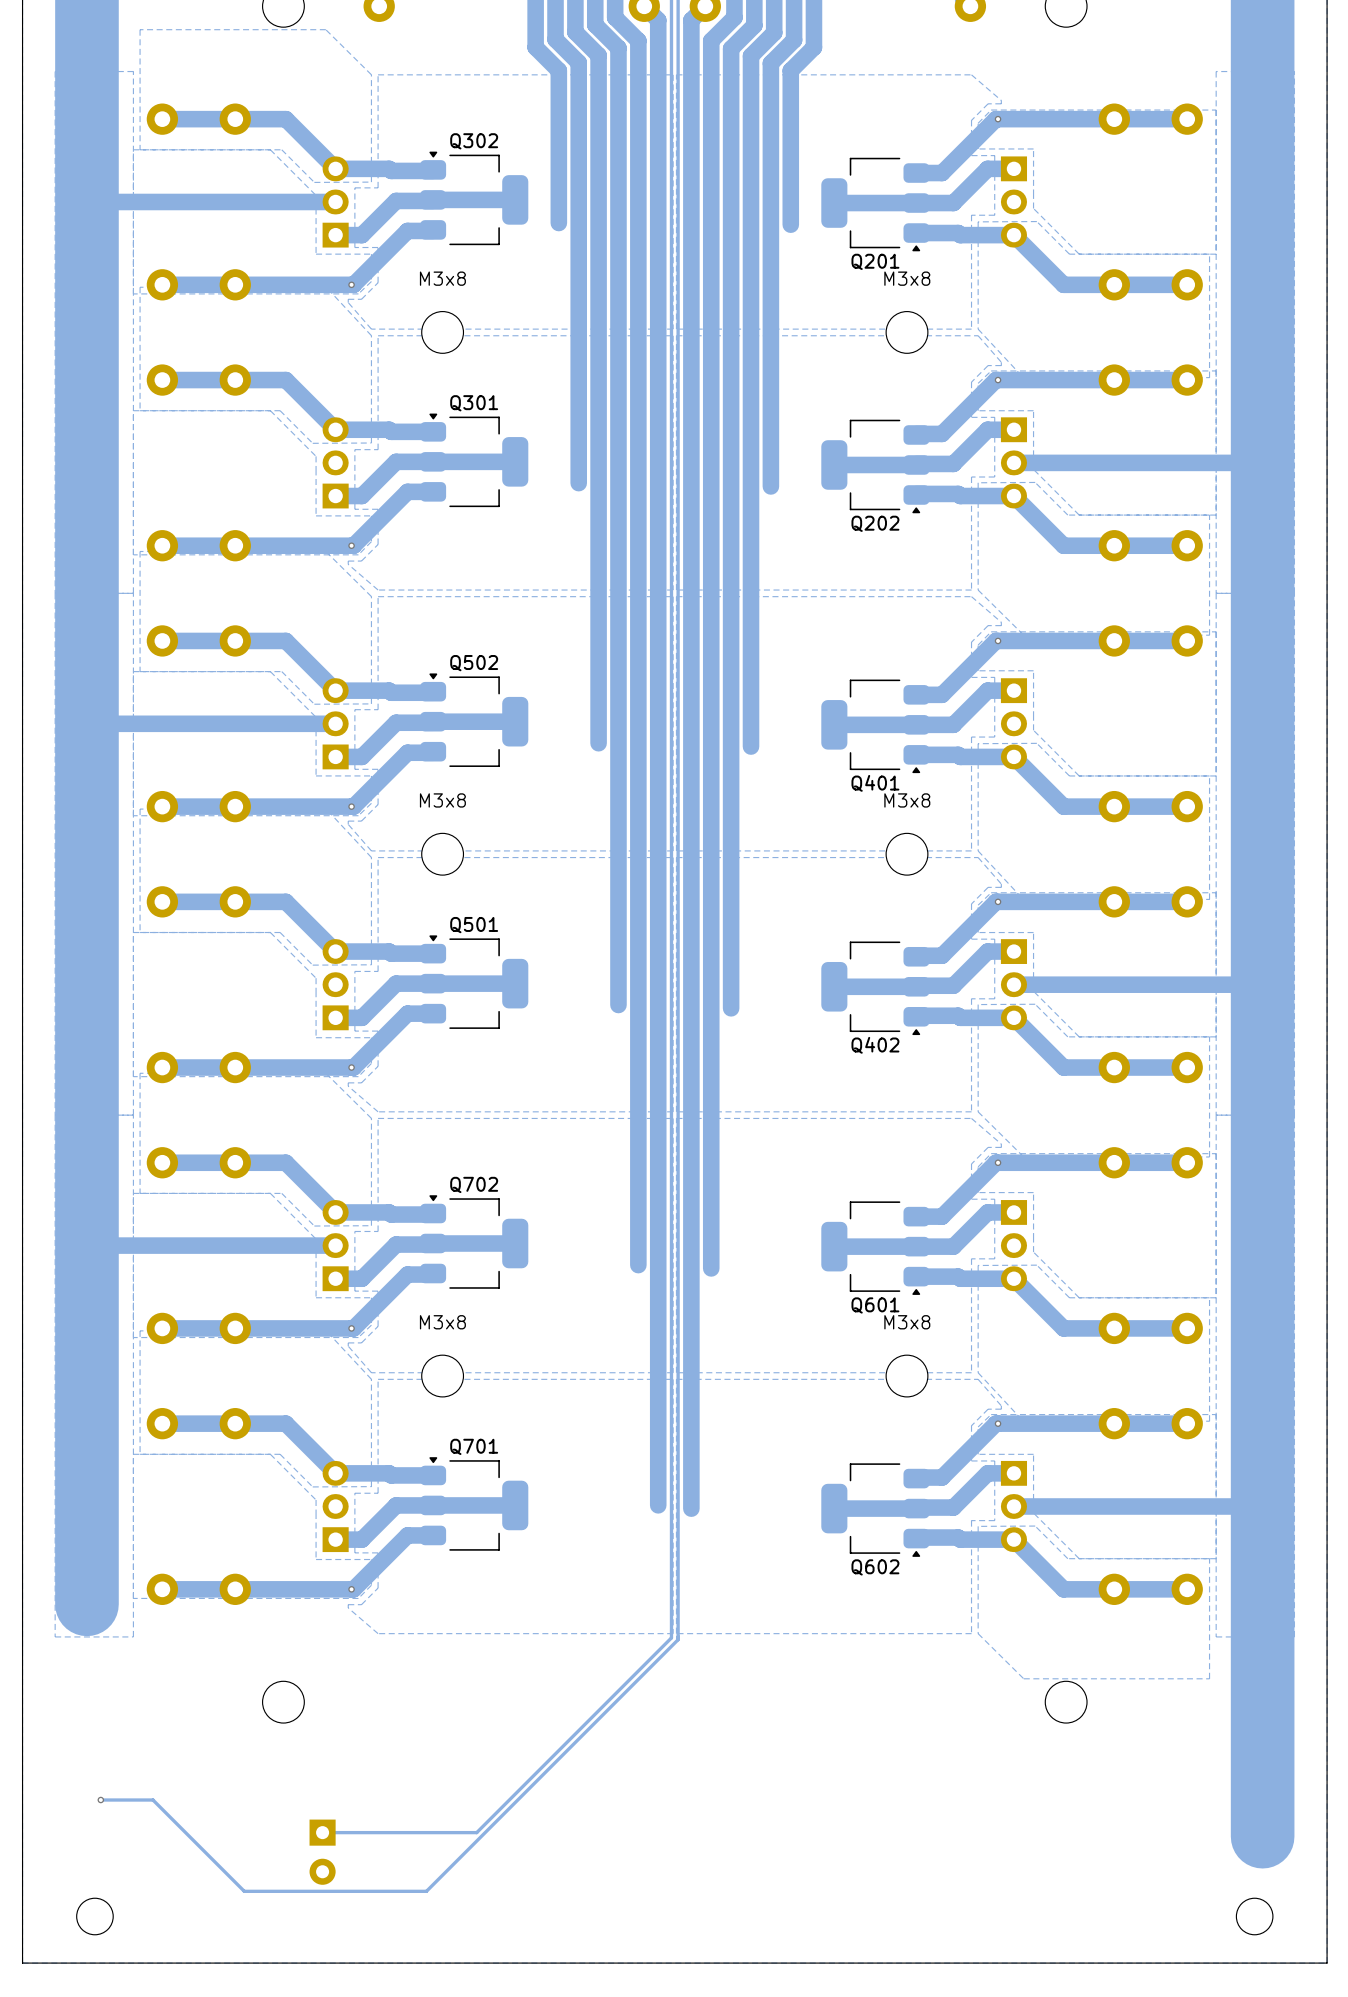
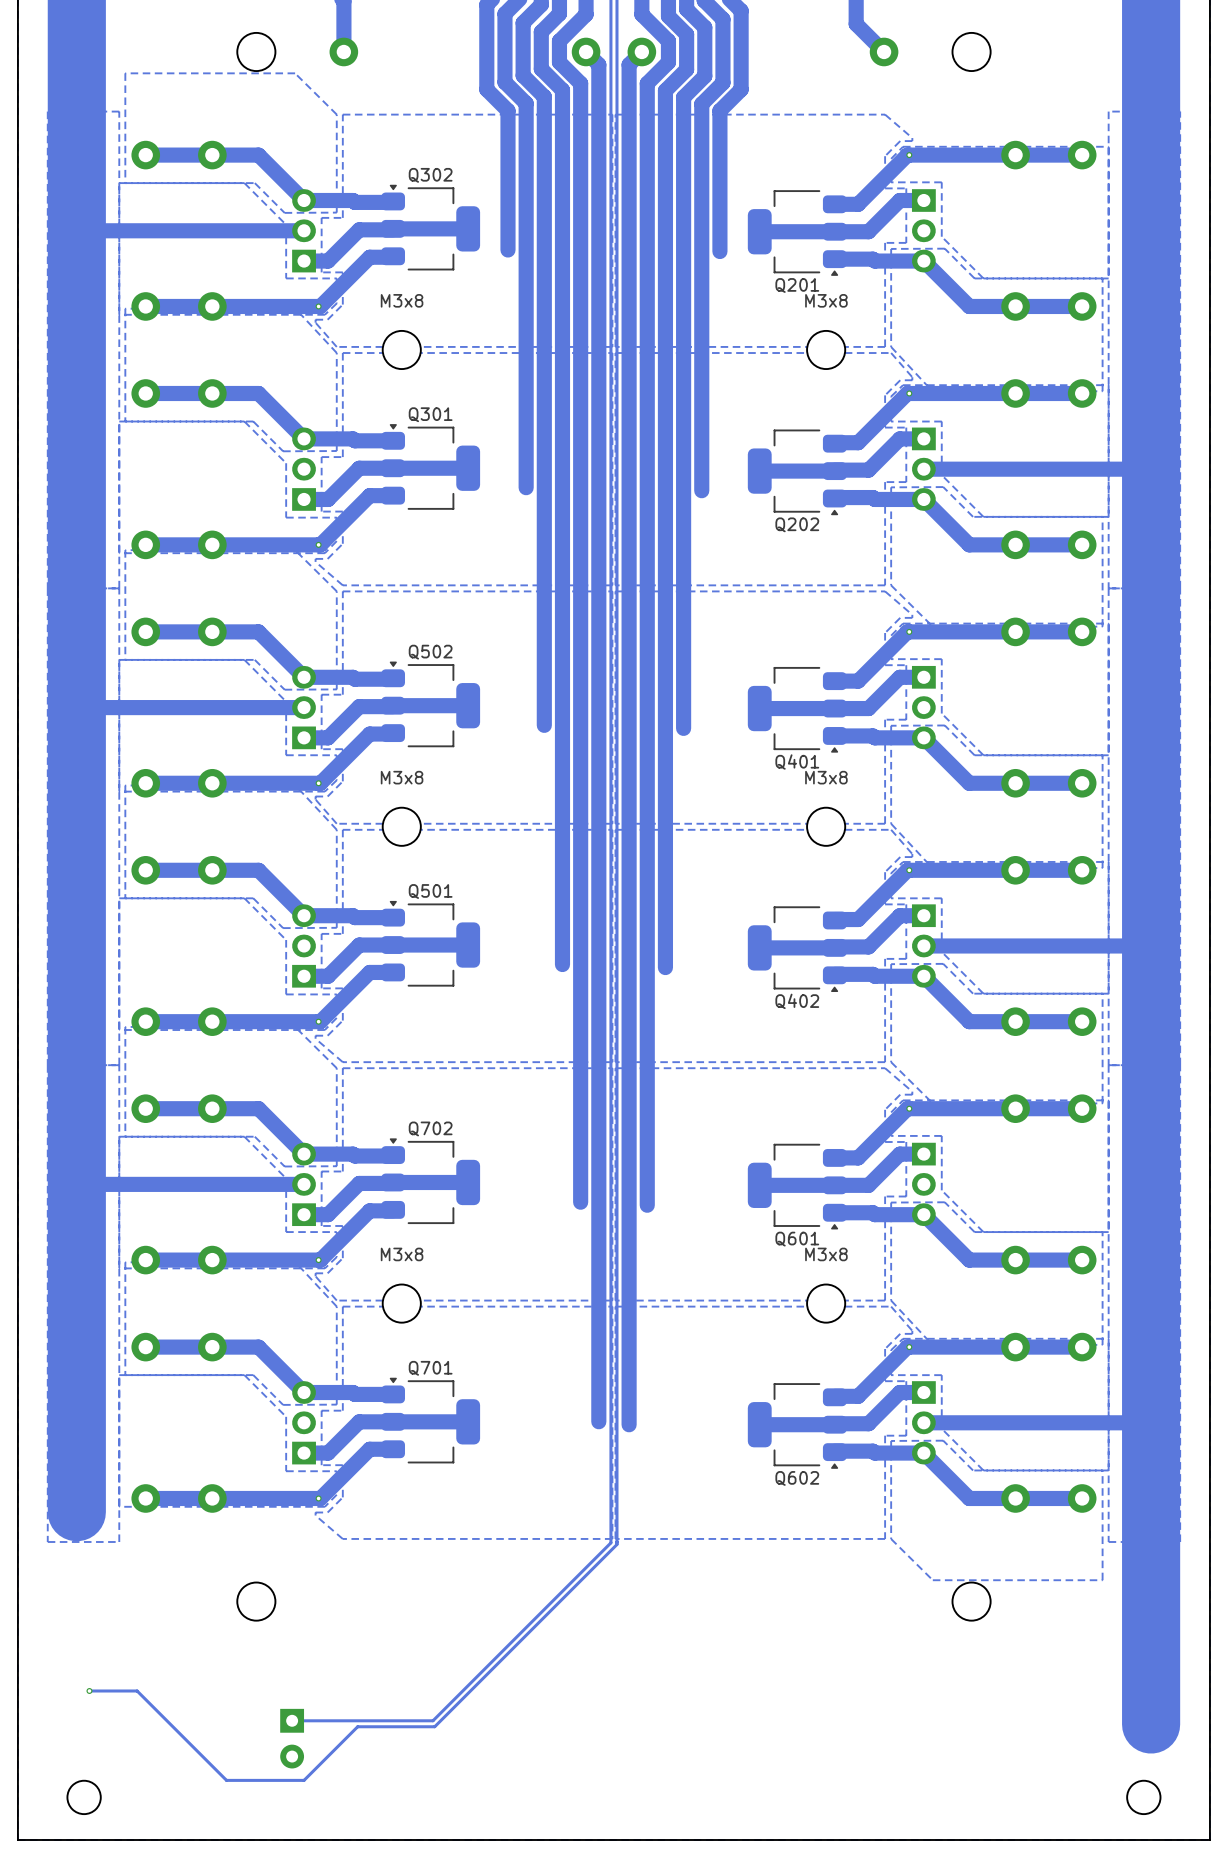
track: (478, 1839) (426, 1891) (244, 1891) -> (434, 1726) (357, 1726) (304, 1780) (226, 1780) (220, 1774)

